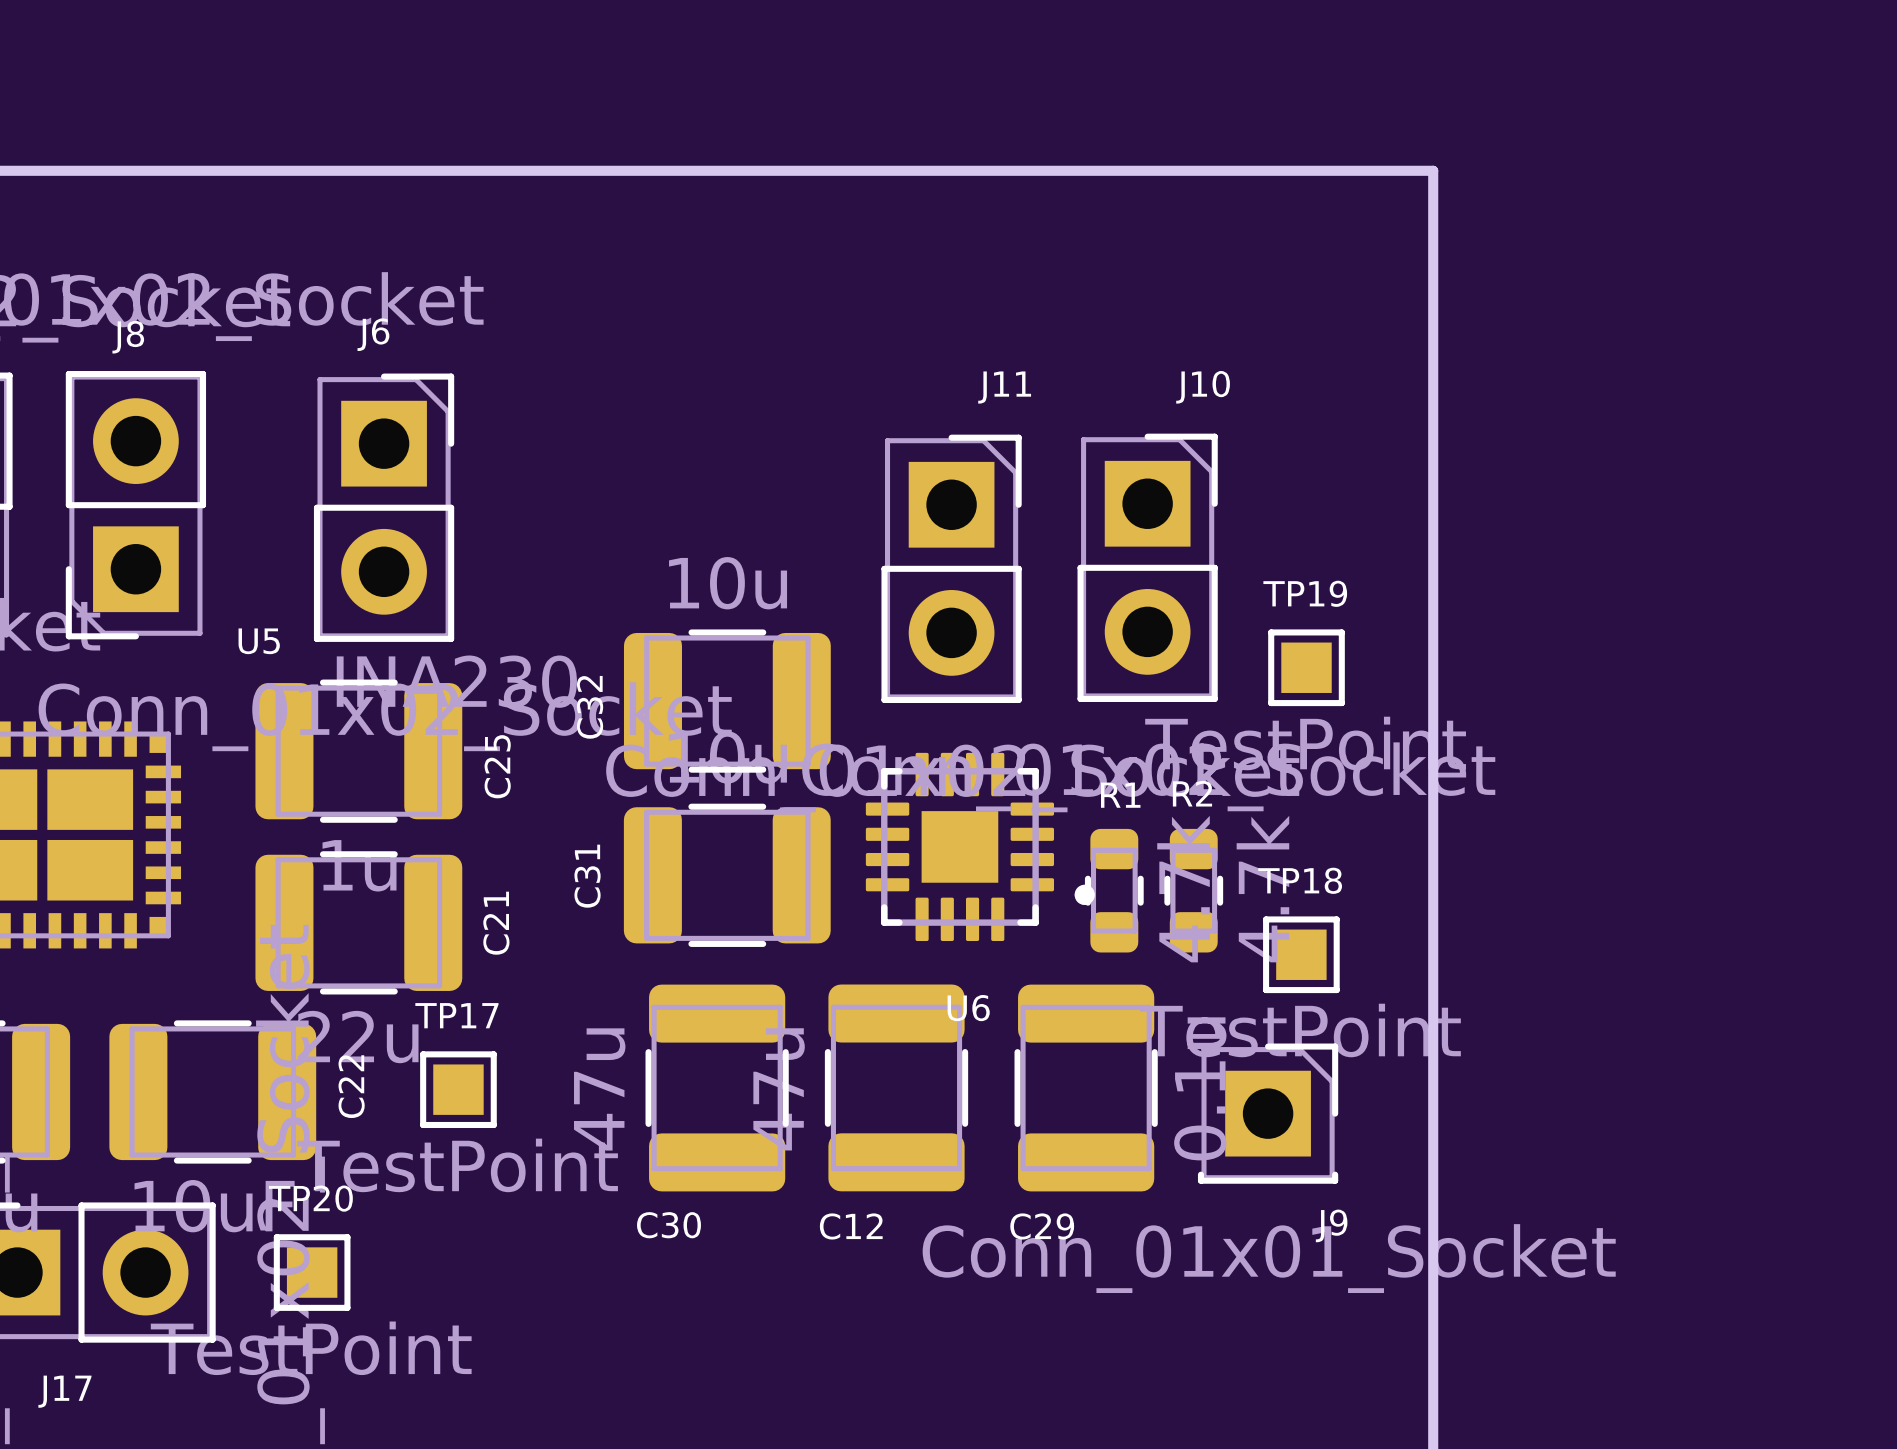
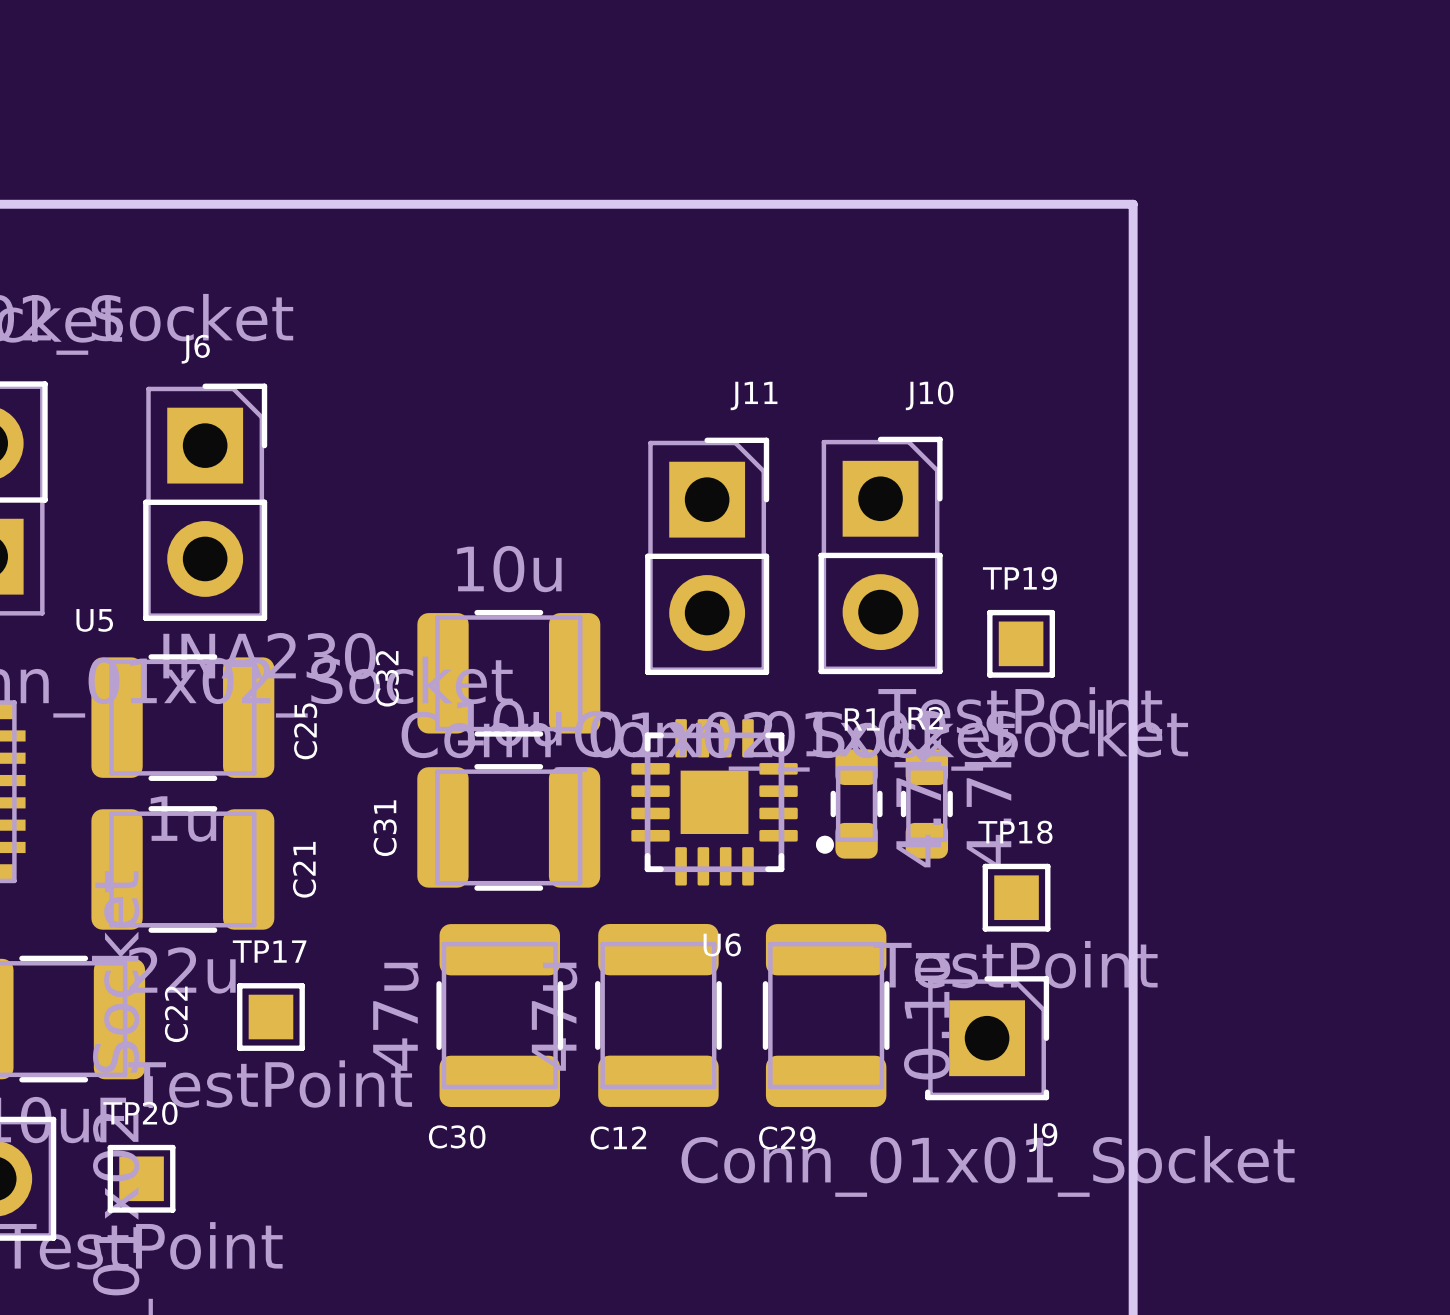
R1 position: (1114, 890) -> (856, 803)
R2 position: (1193, 890) -> (926, 803)

